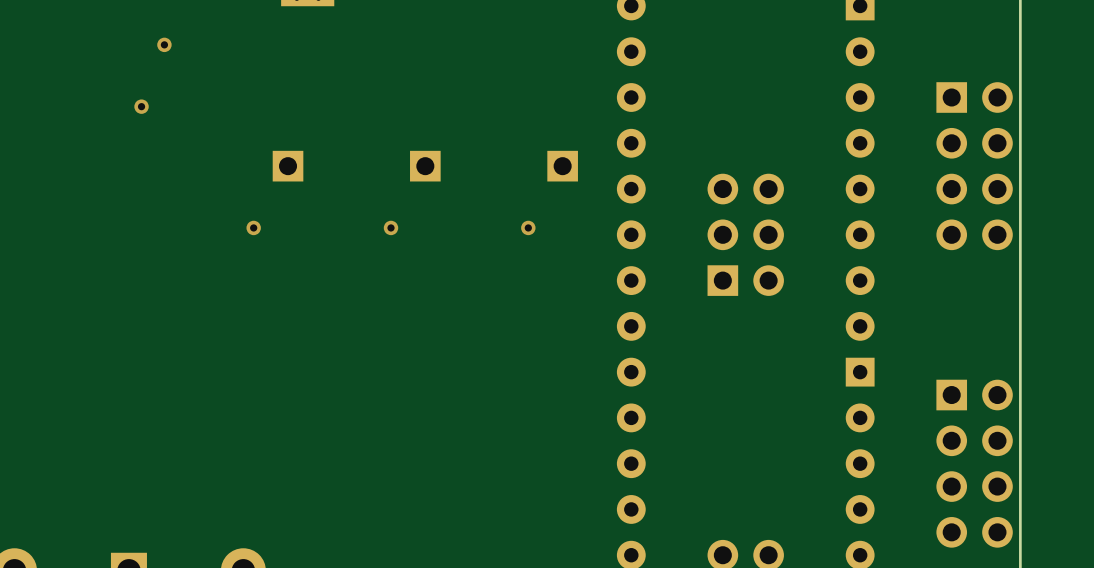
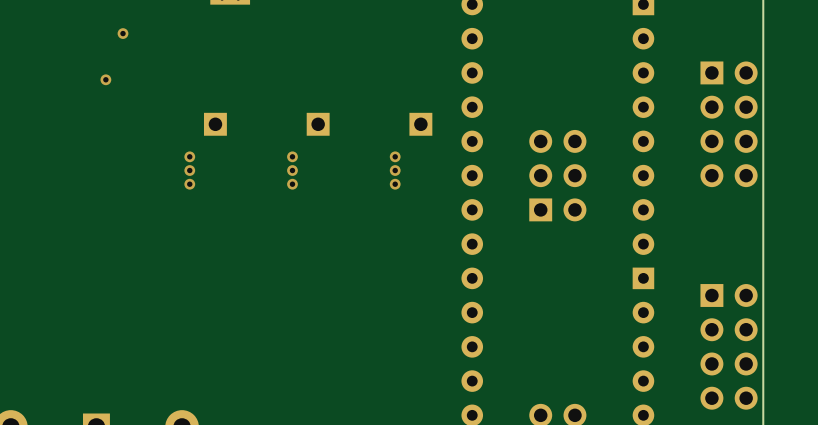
via: none -> (189, 156)
via: none -> (292, 156)
via: none -> (395, 156)
via: none -> (189, 184)
via: none -> (292, 184)
via: none -> (395, 184)

